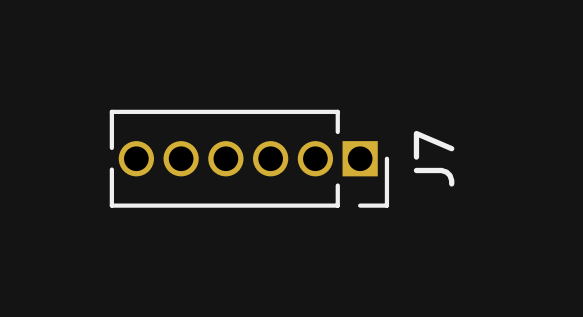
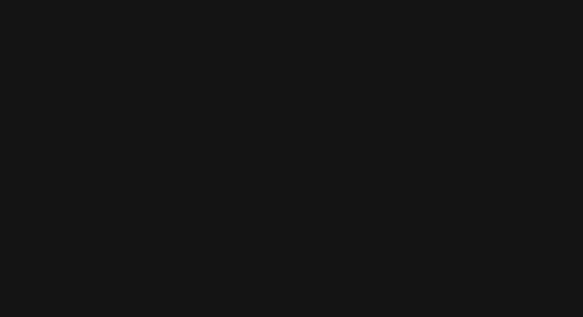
J7: (249, 158) -> none

